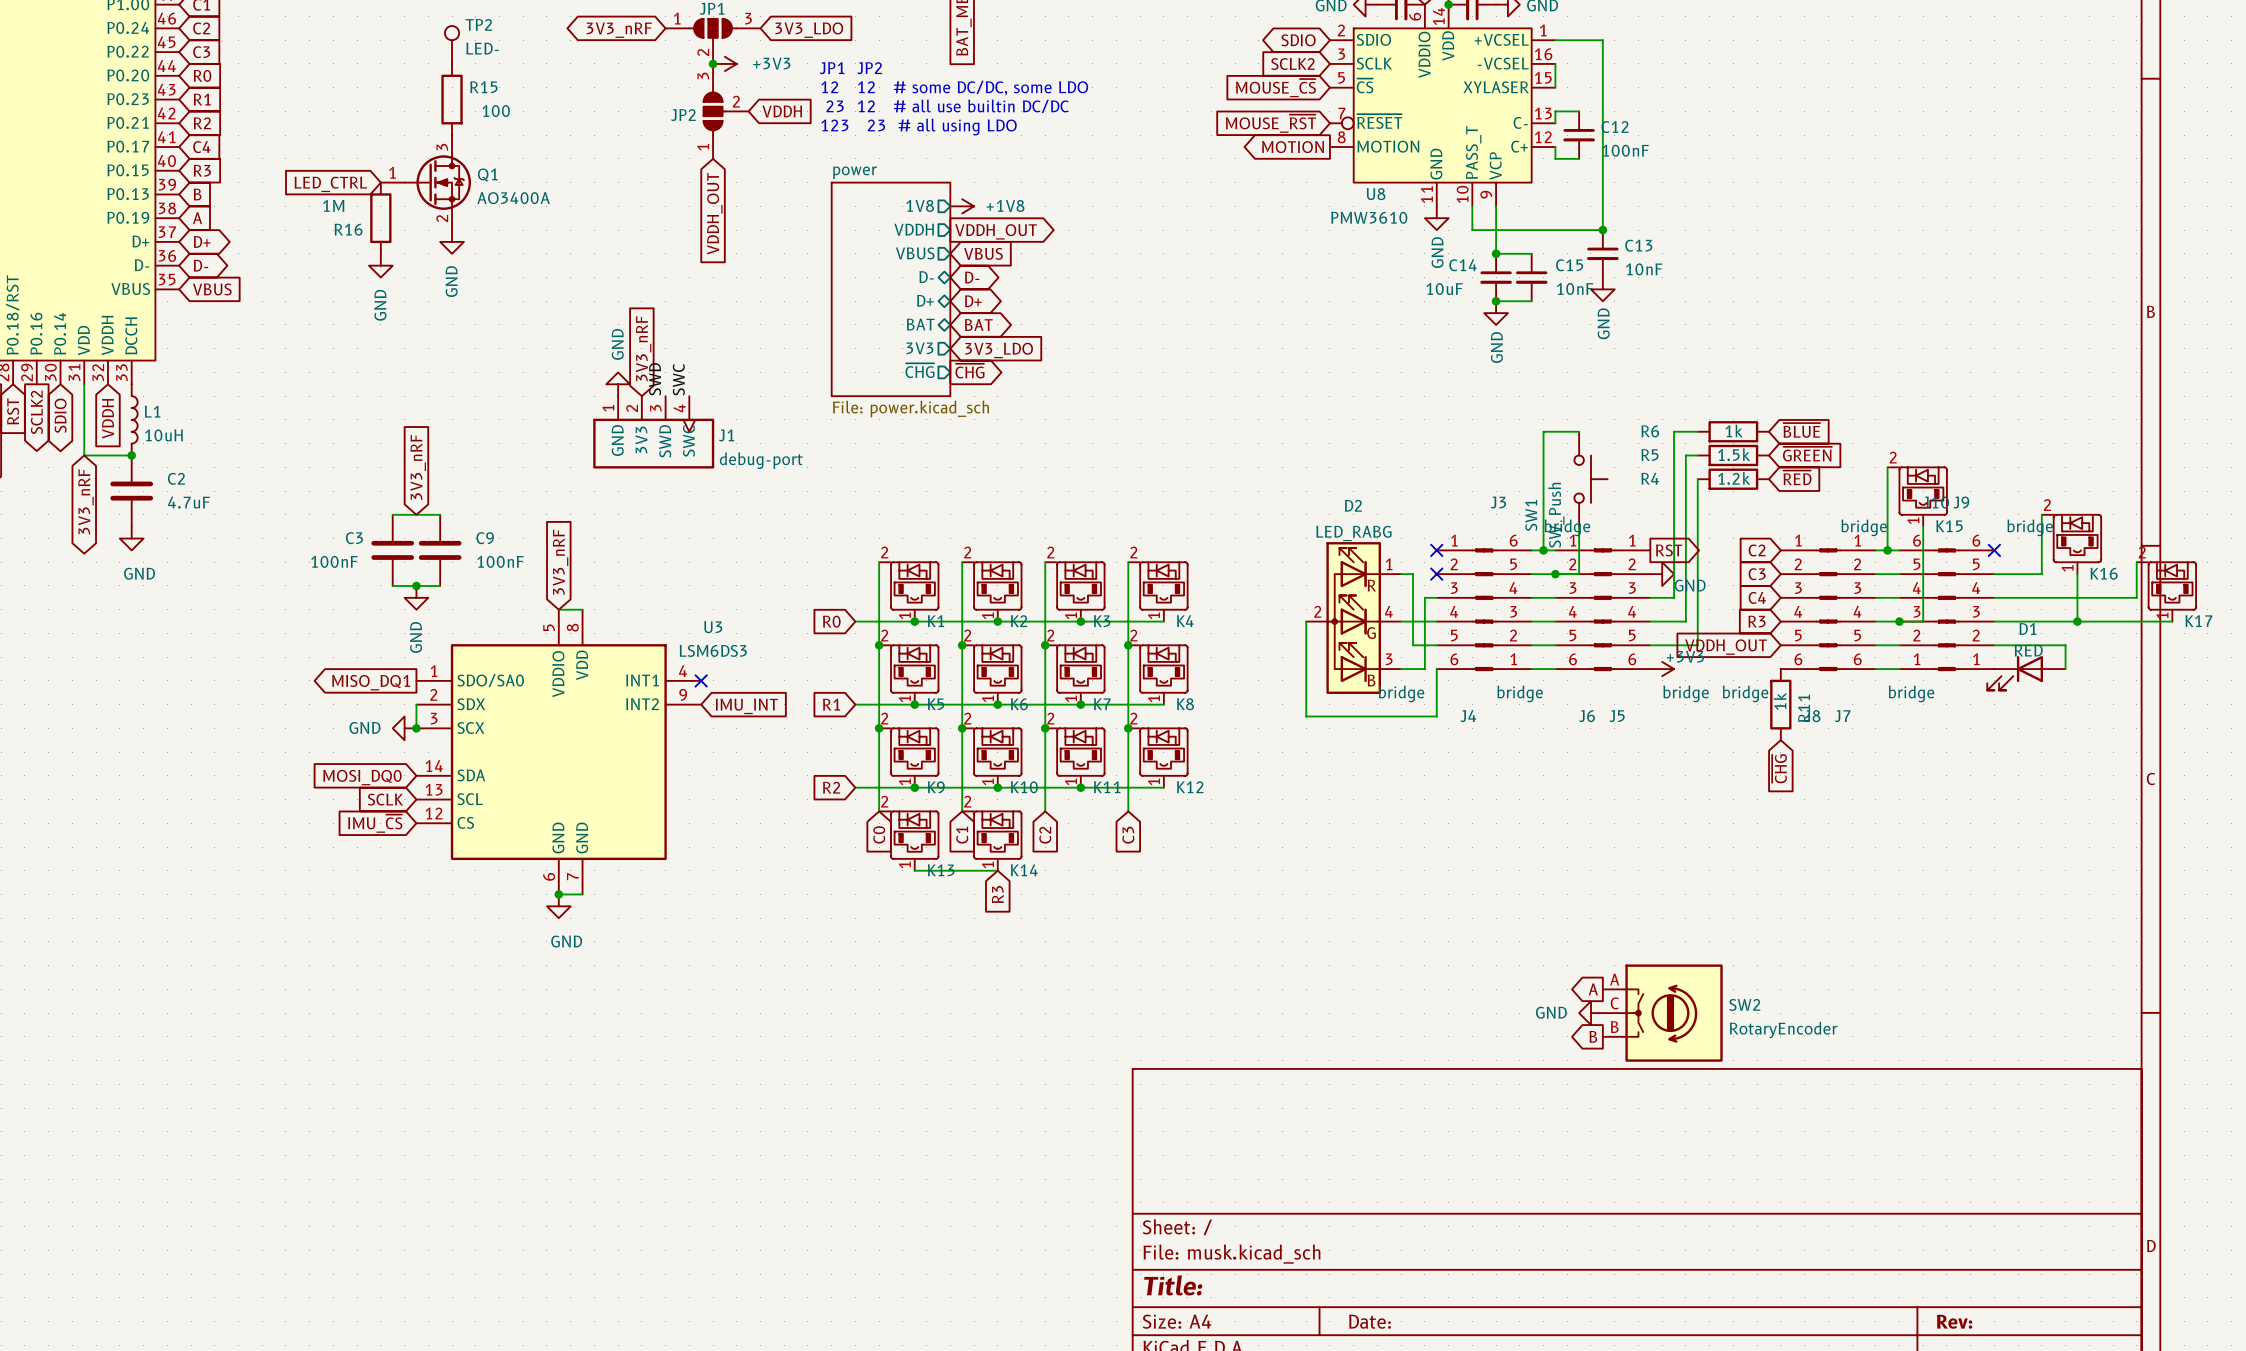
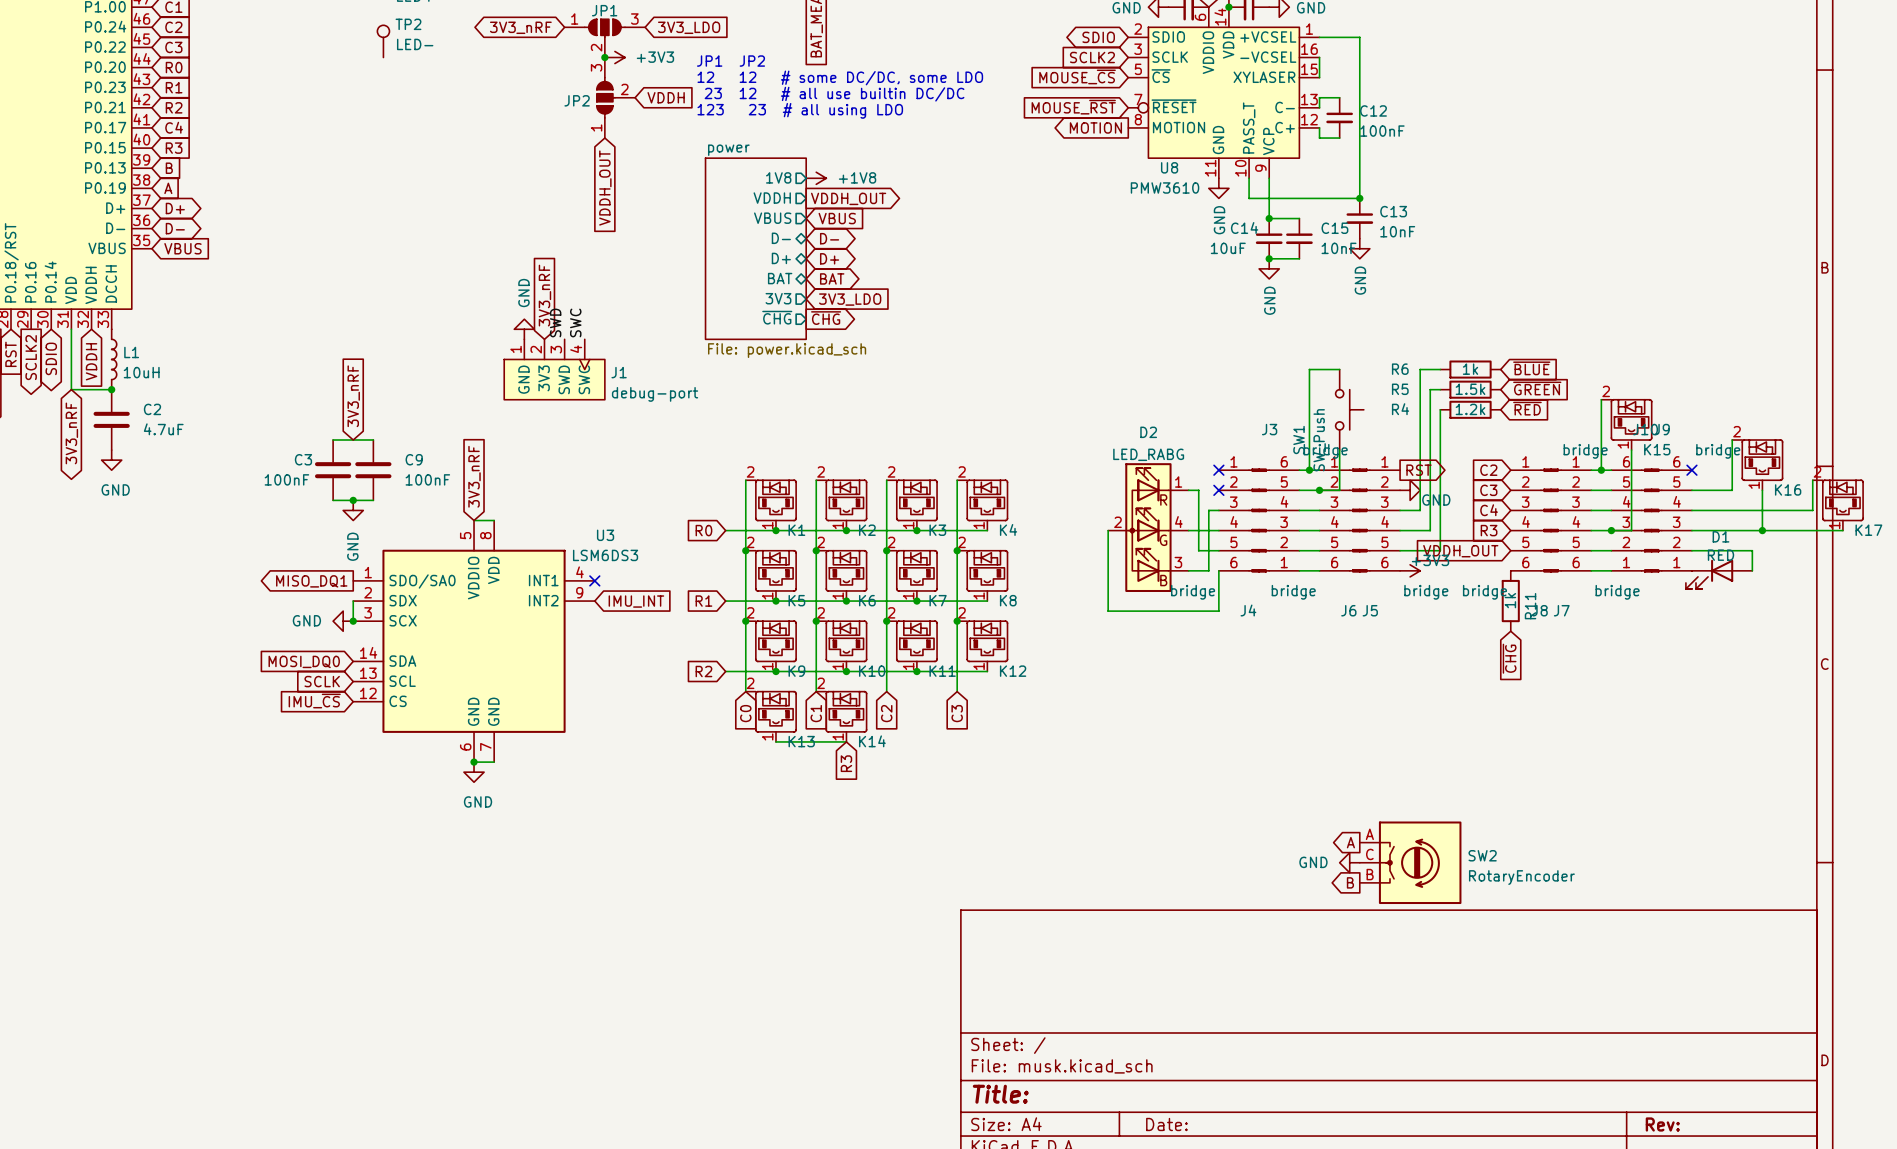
R15: 100 (452, 99) -> none
Q1: AO3400A (425, 182) -> none
global label: LED_CTRL (330, 184) -> none
R16: 1M (380, 218) -> none
power symbol: GND (452, 241) -> none
power symbol: GND (380, 265) -> none
J1 symbol: [593, 396, 715, 469] -> [504, 339, 605, 400]

